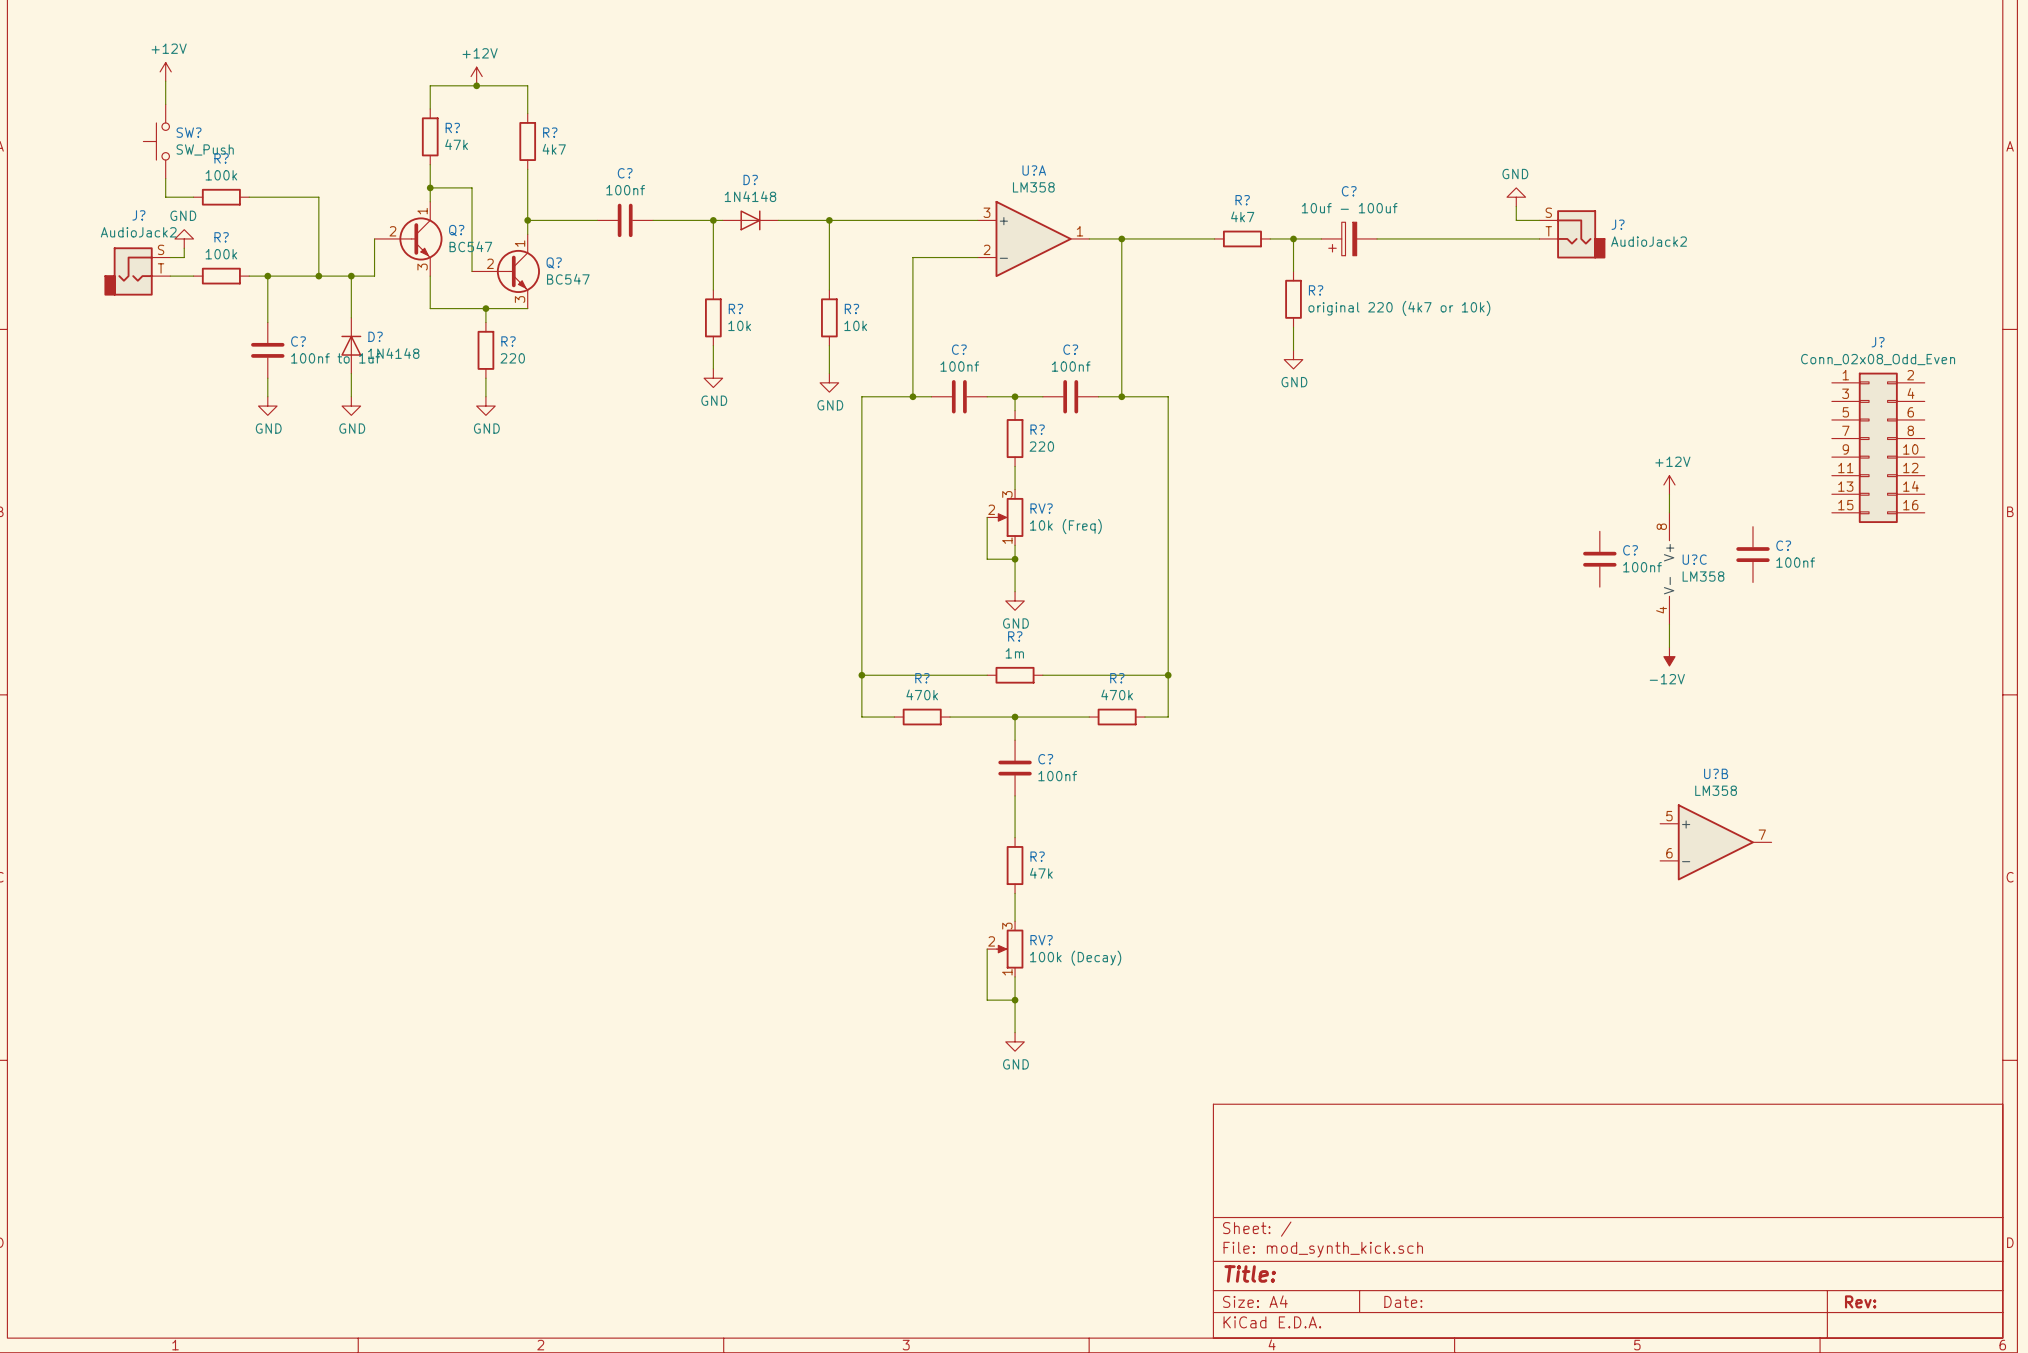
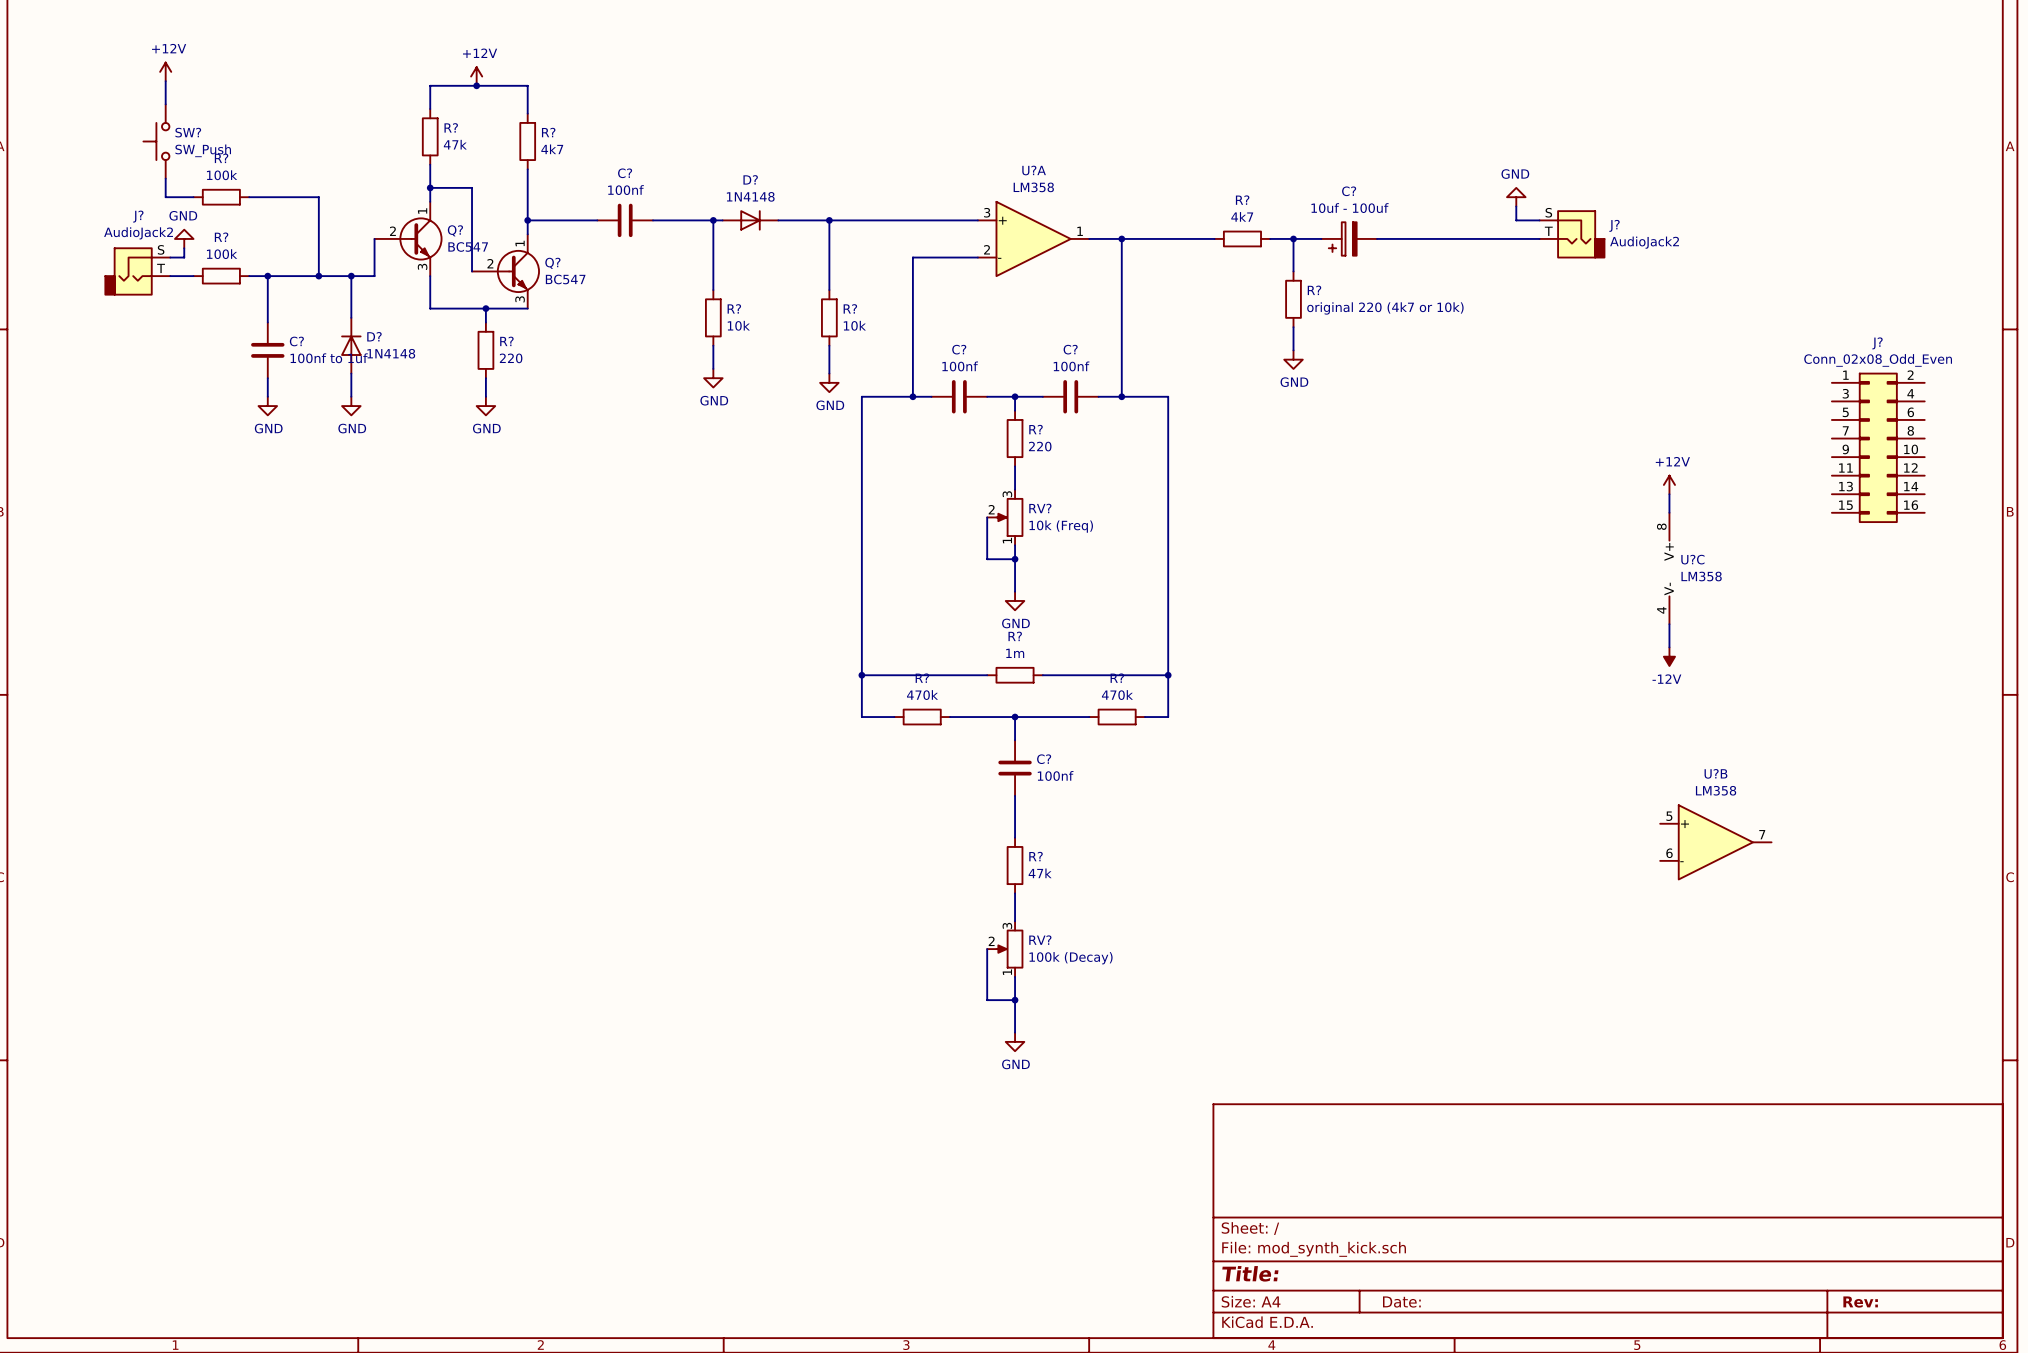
C?: 100nf (1752, 554) -> none
C?: 100nf (1599, 559) -> none

